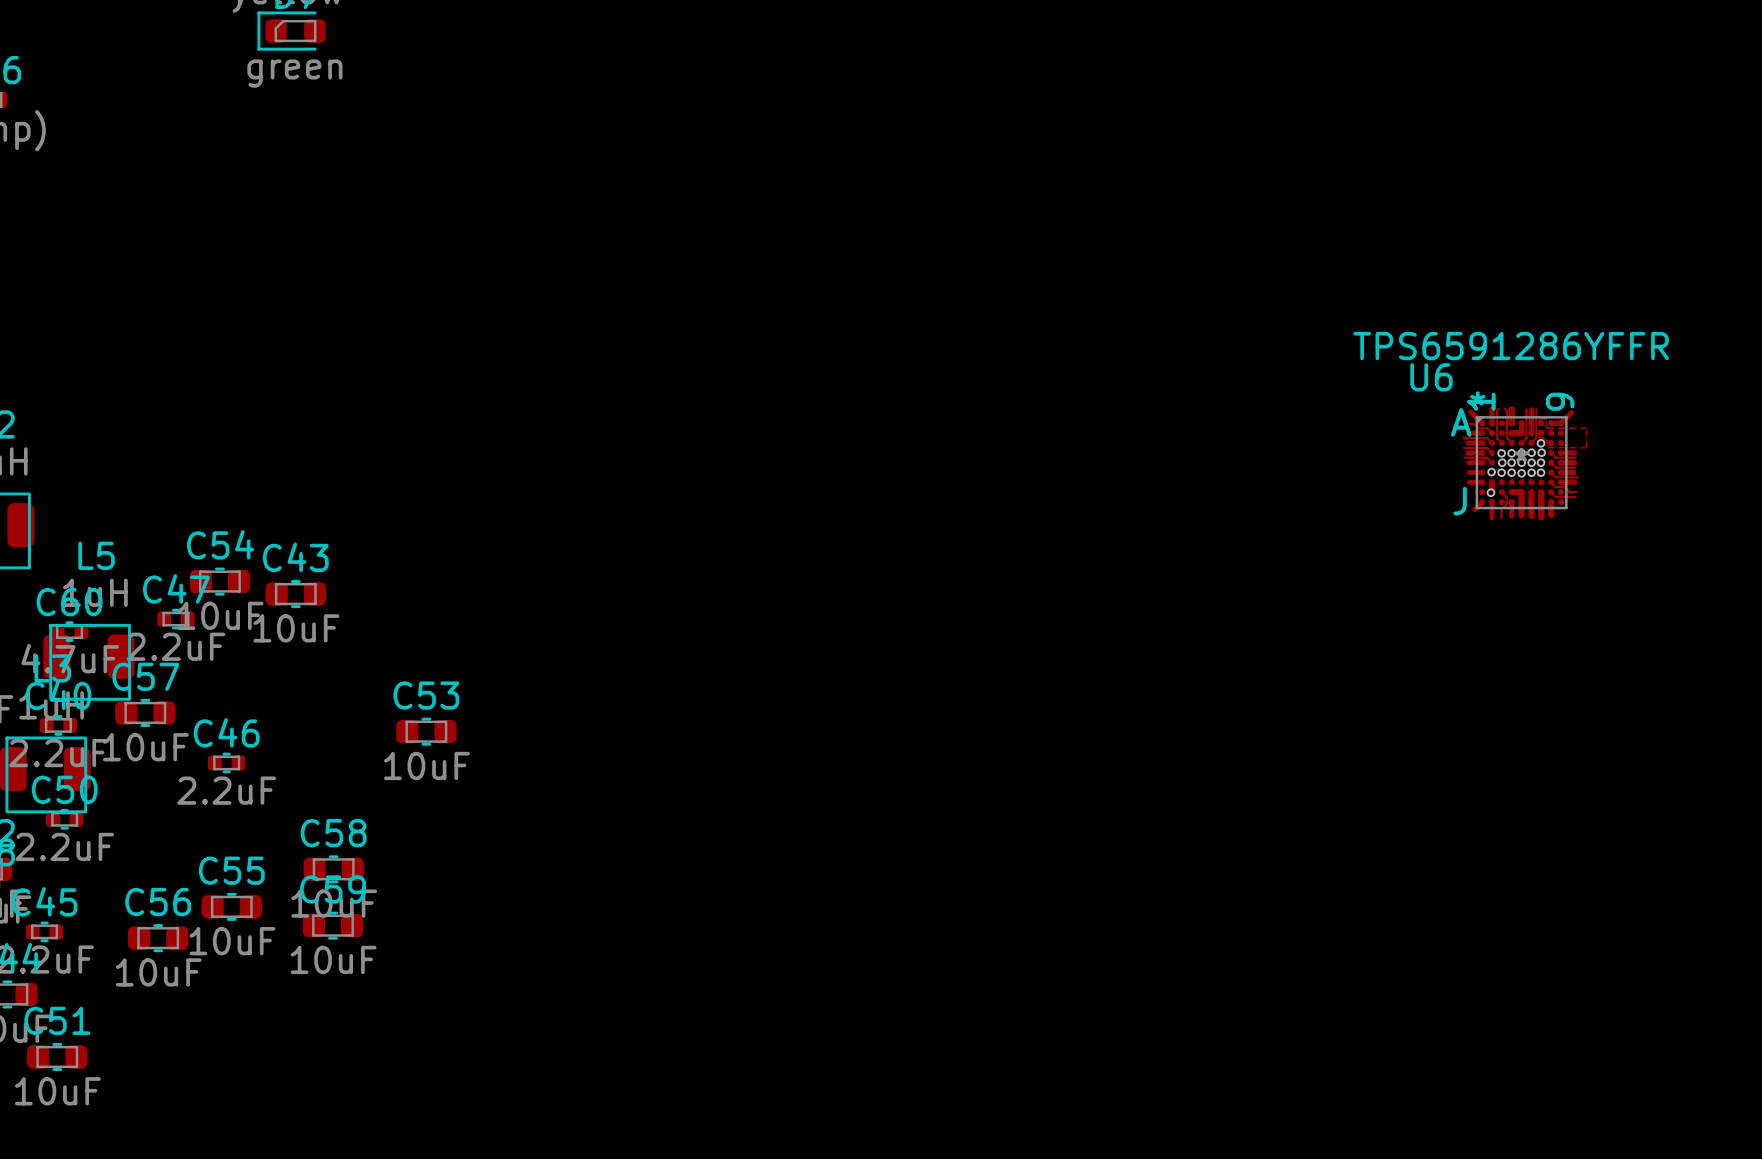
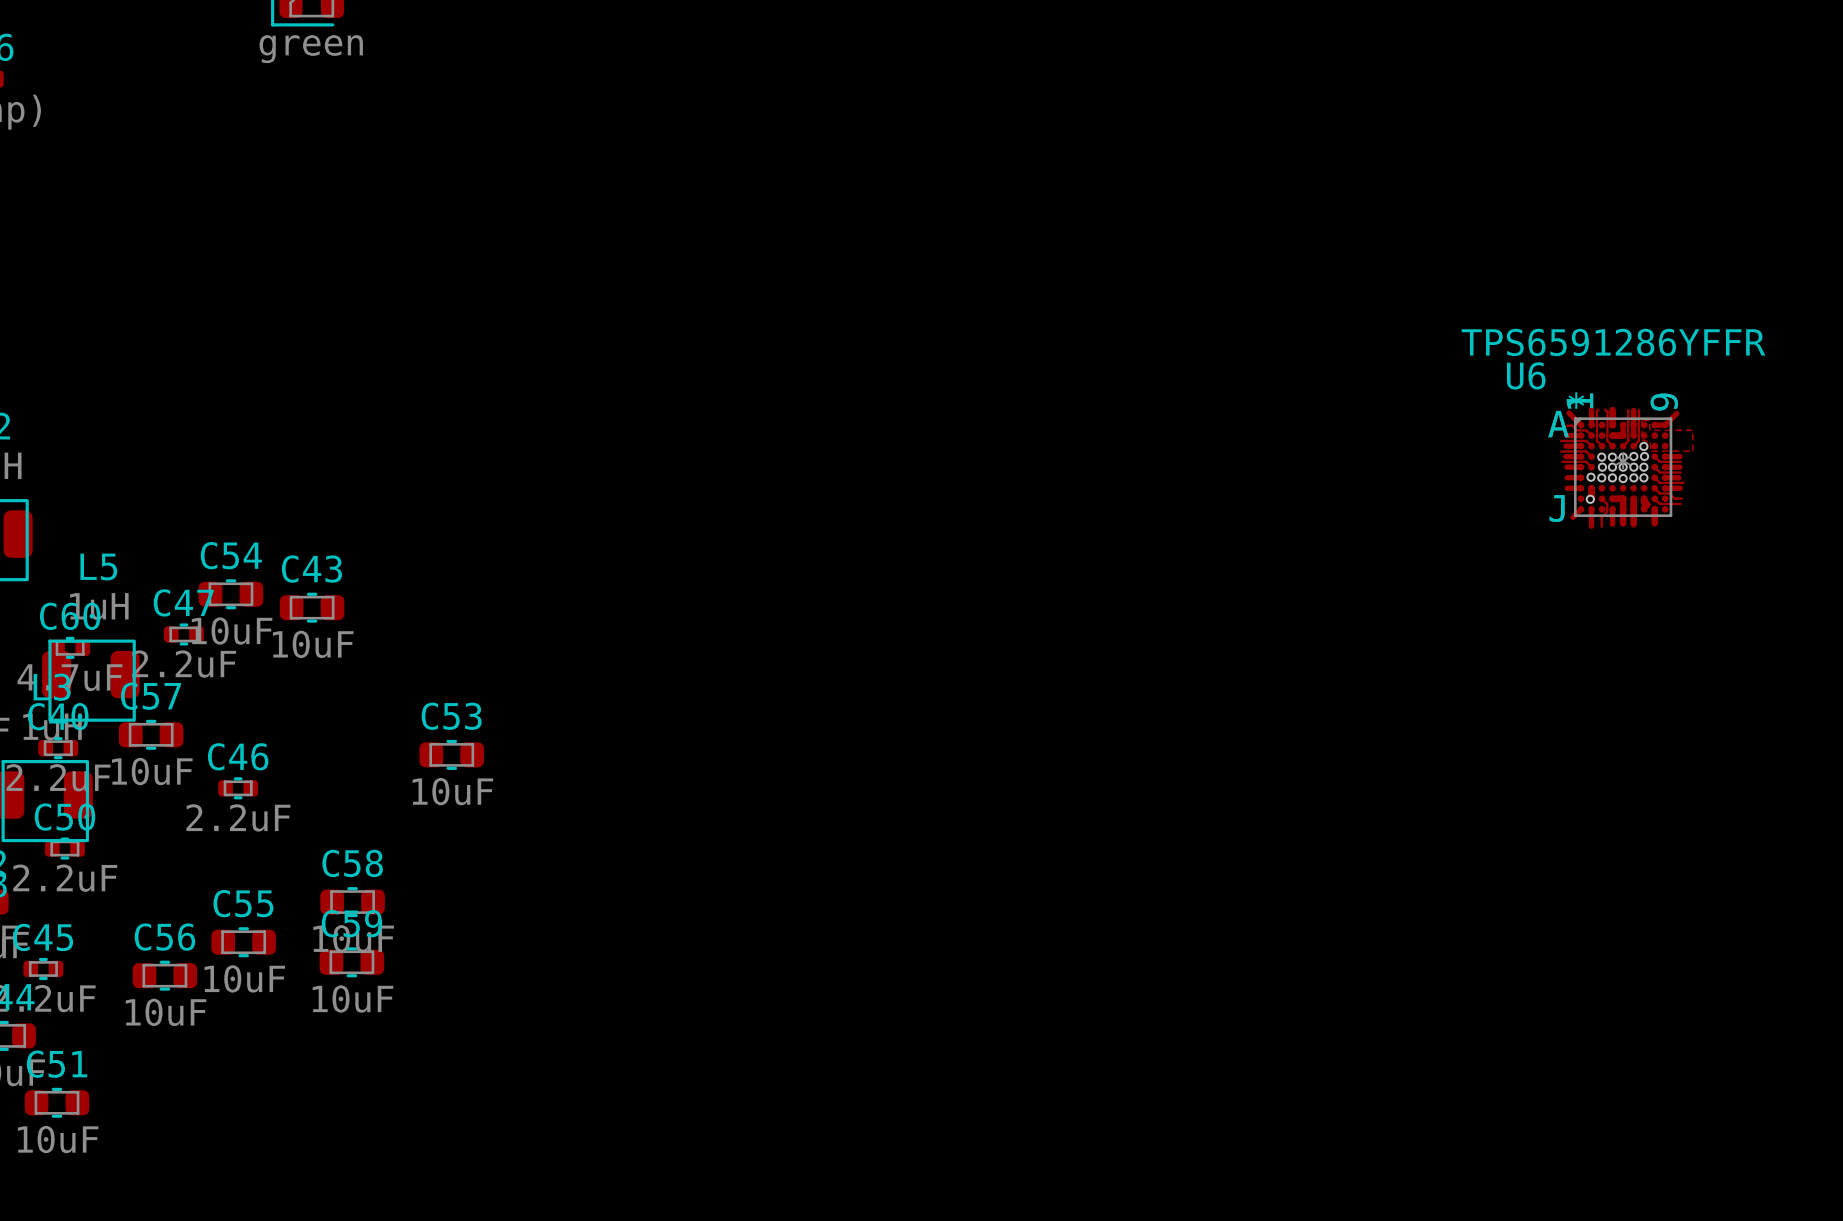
top track: (1541, 494) (1541, 517) -> (1644, 501) (1647, 504) (1644, 507)

